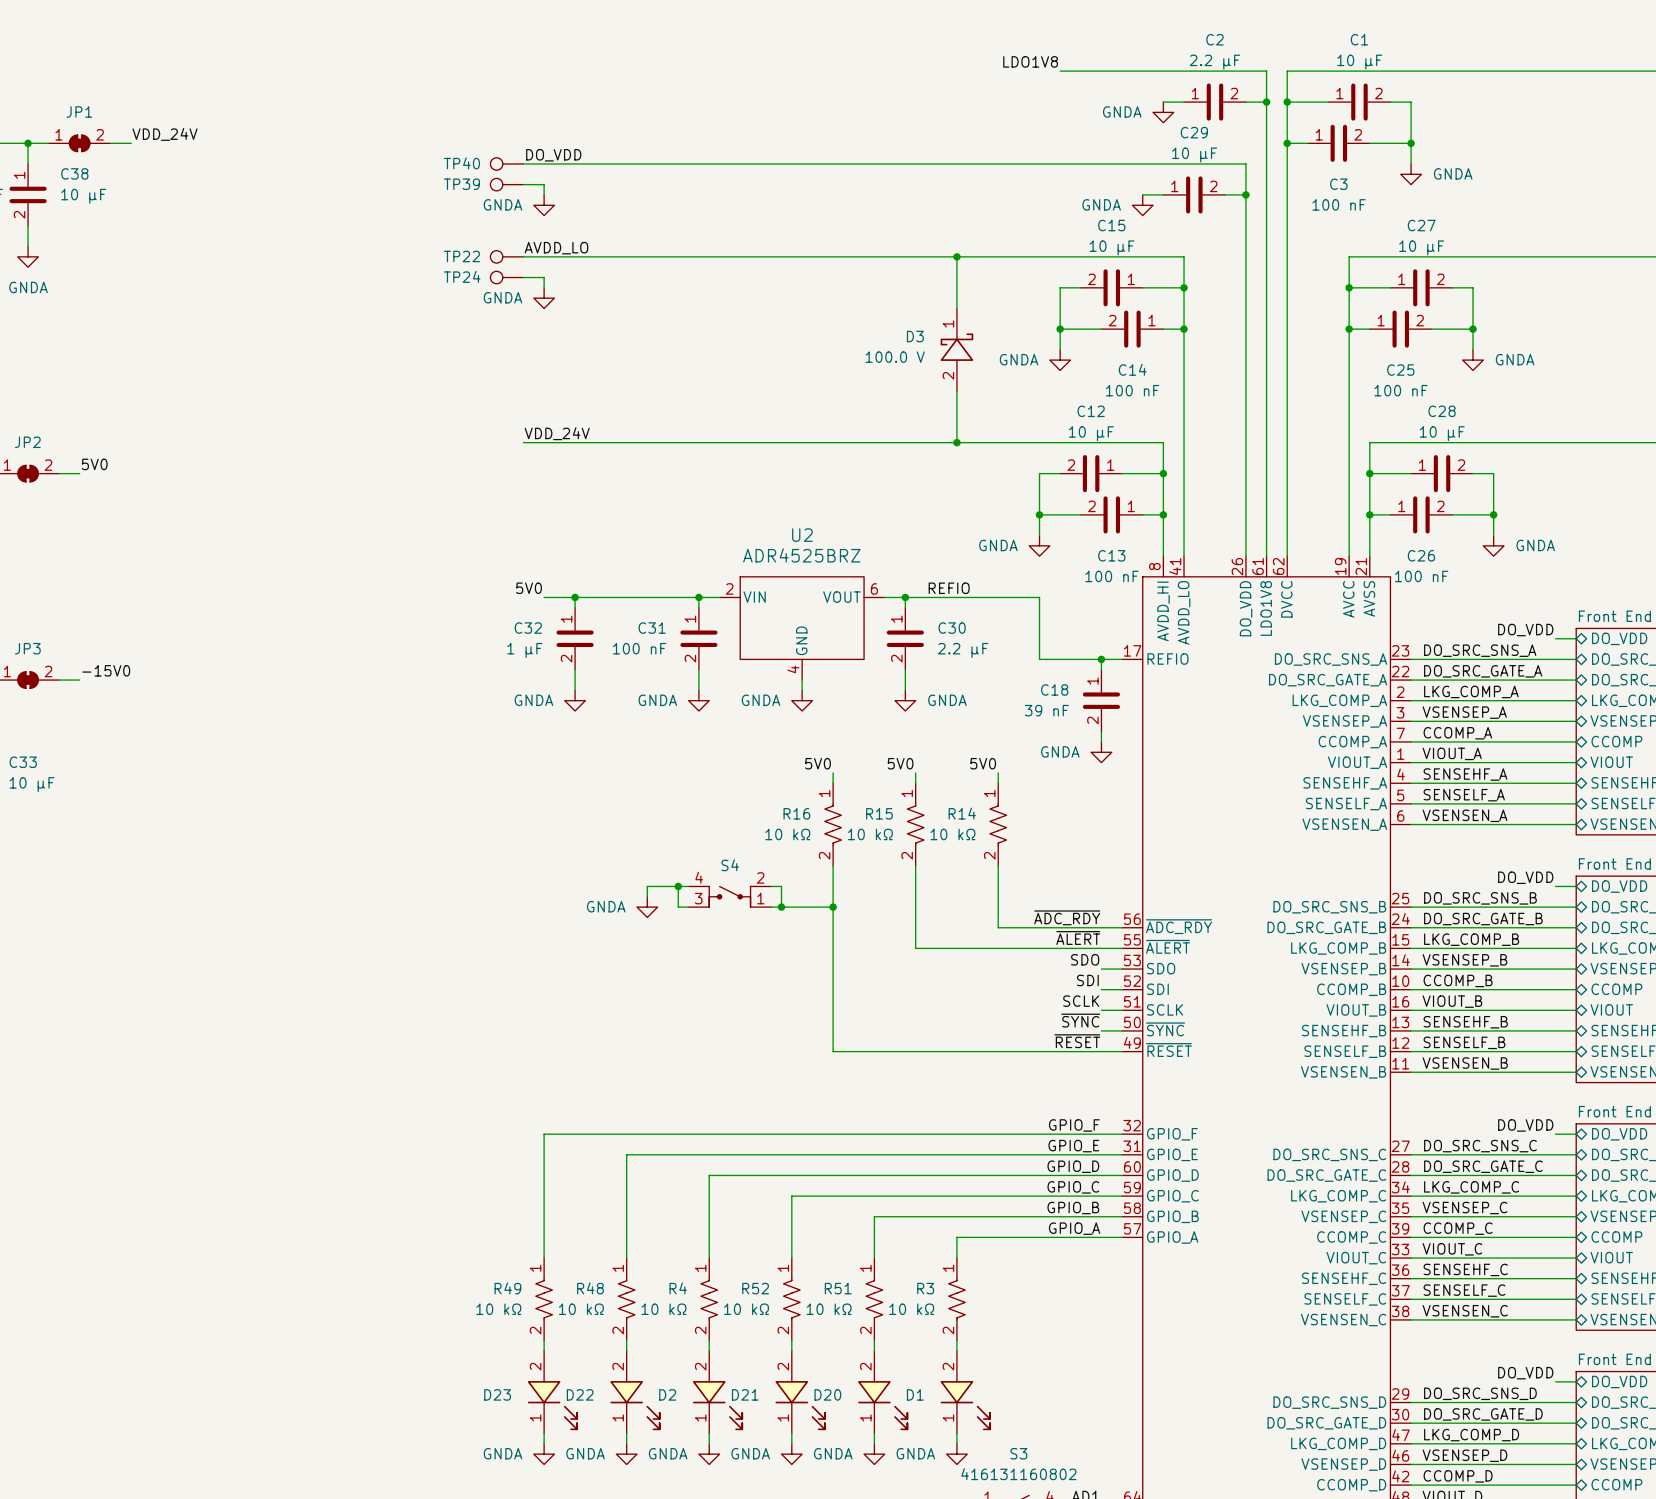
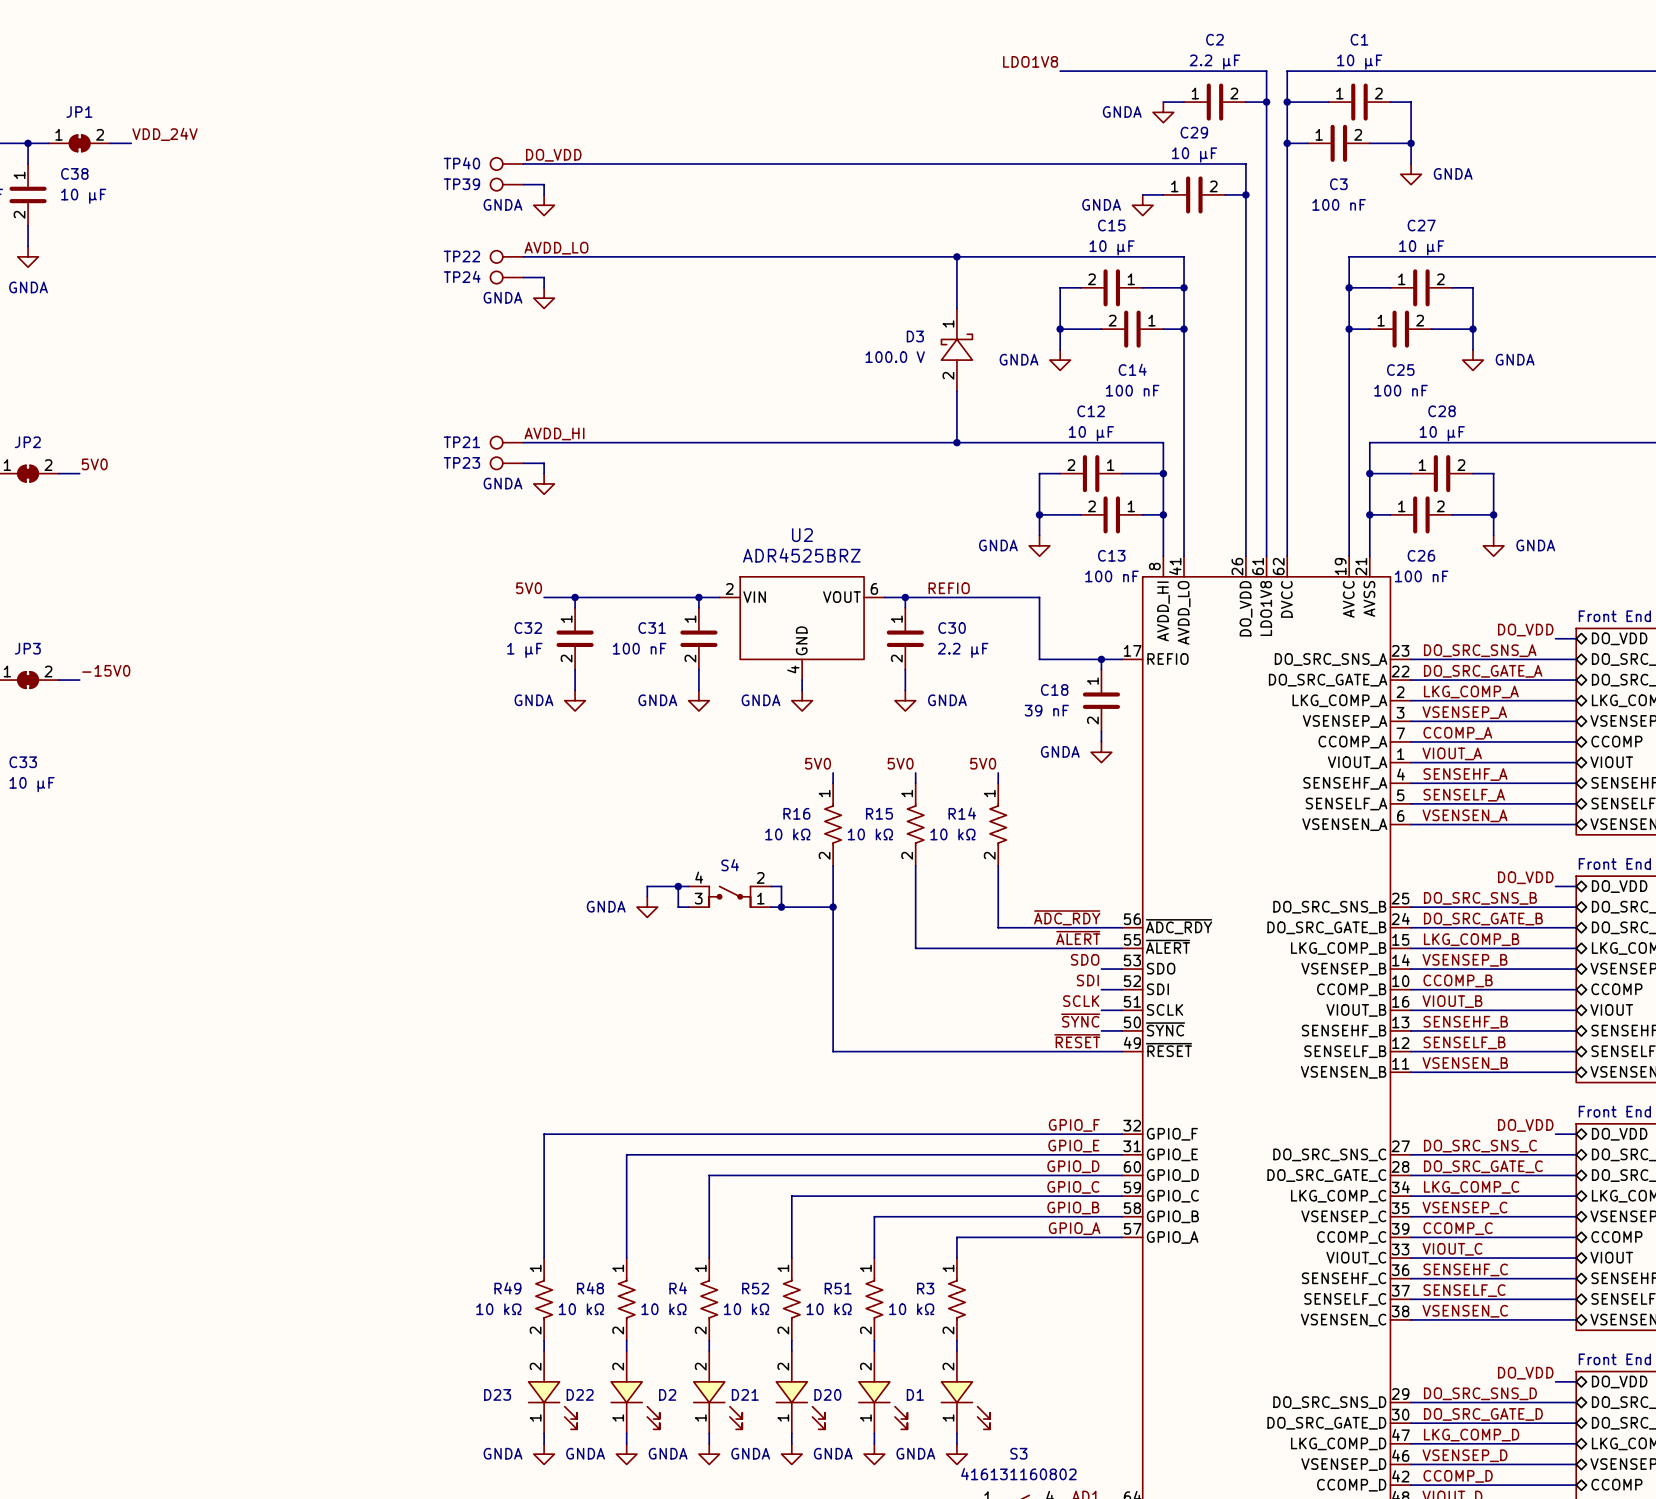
label: VDD_24V (557, 433) -> AVDD_HI (554, 433)
TP21: none -> (506, 442)
TP23: none -> (506, 463)
wire: none -> (523, 463) (544, 463) (544, 473)
power symbol: none -> GNDA (544, 483)

